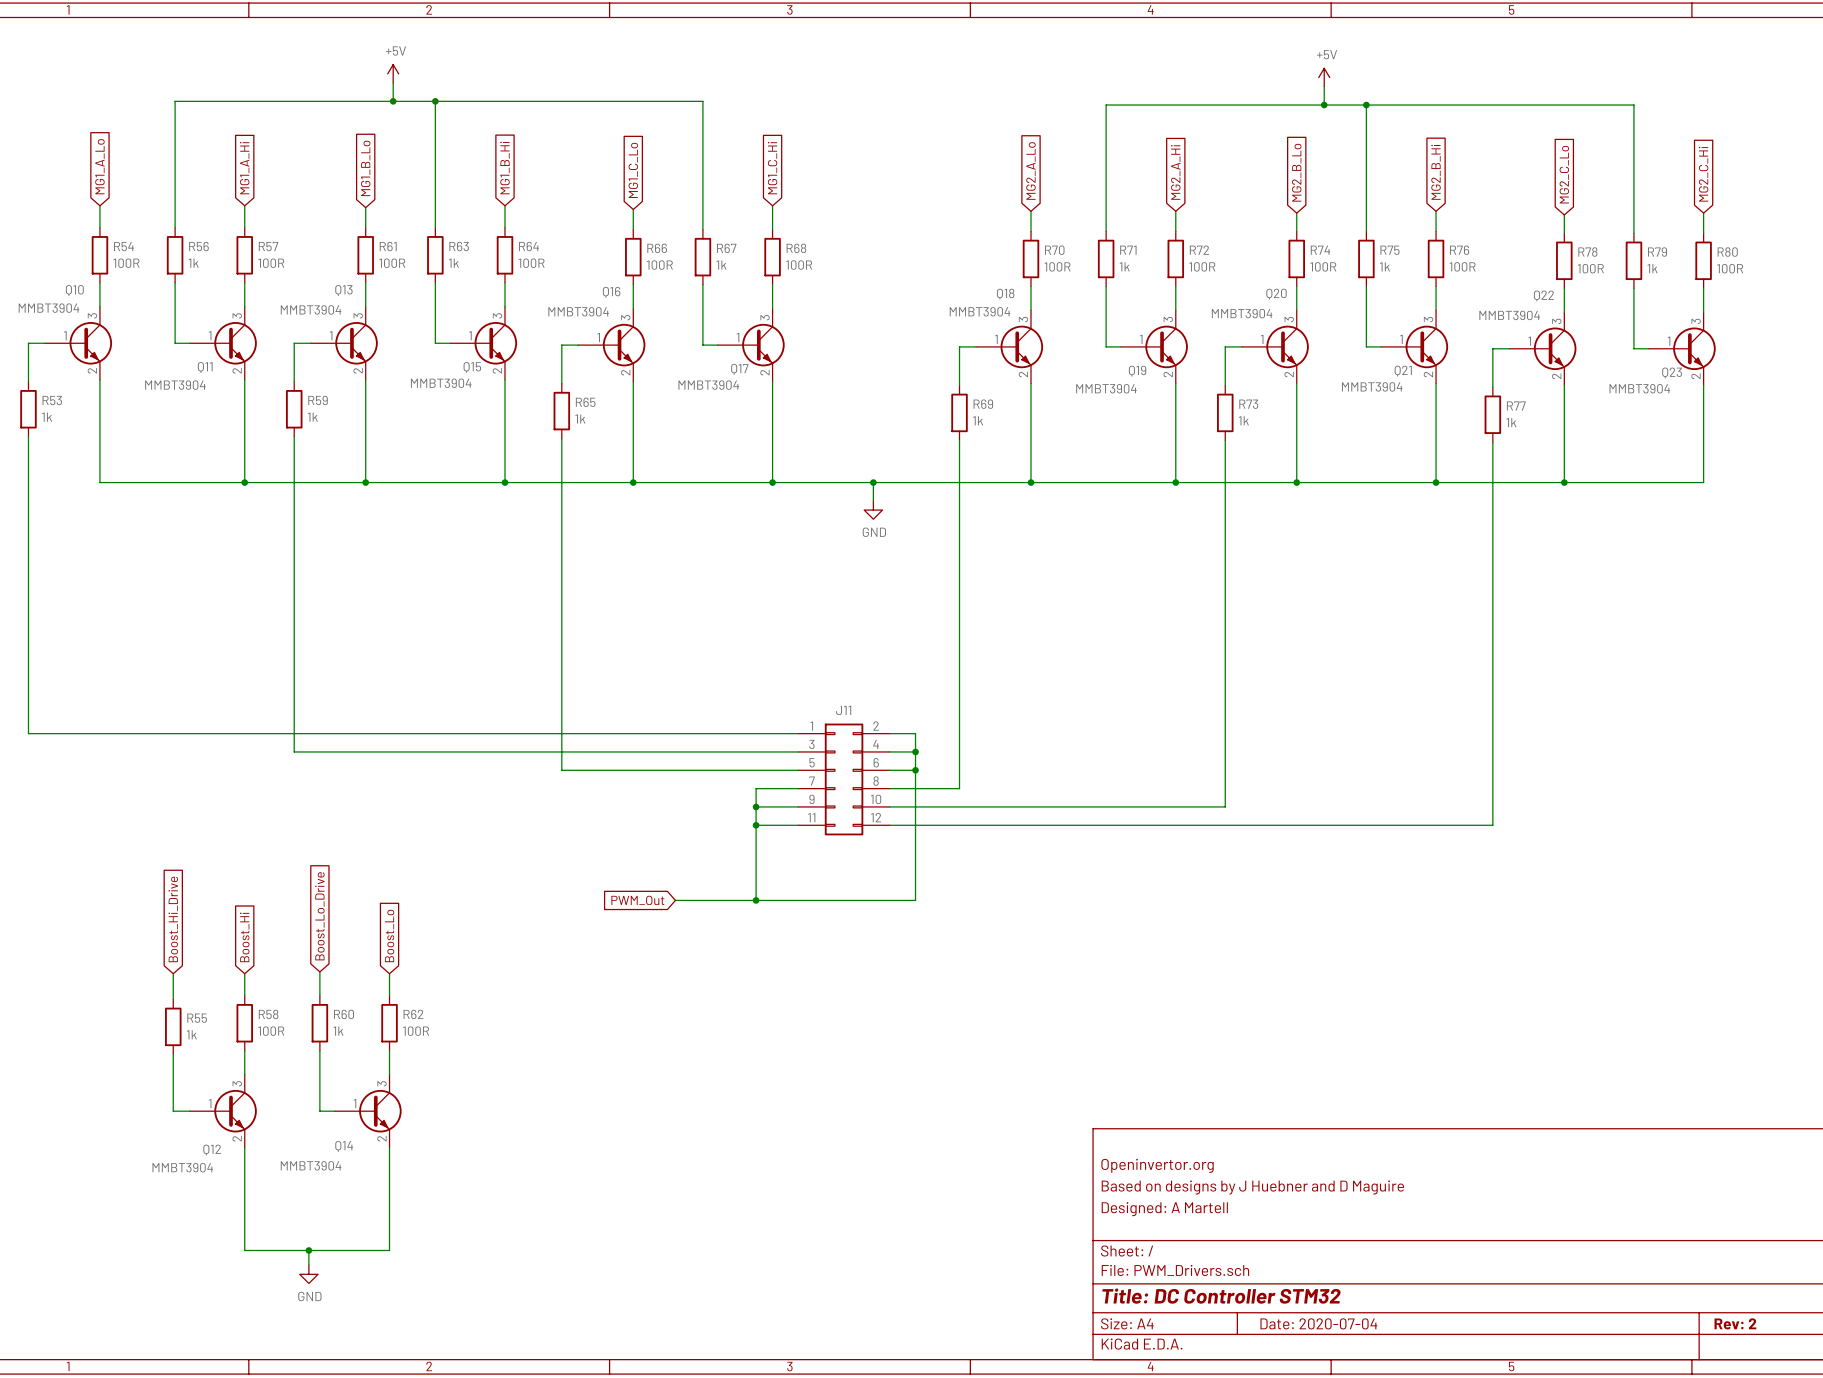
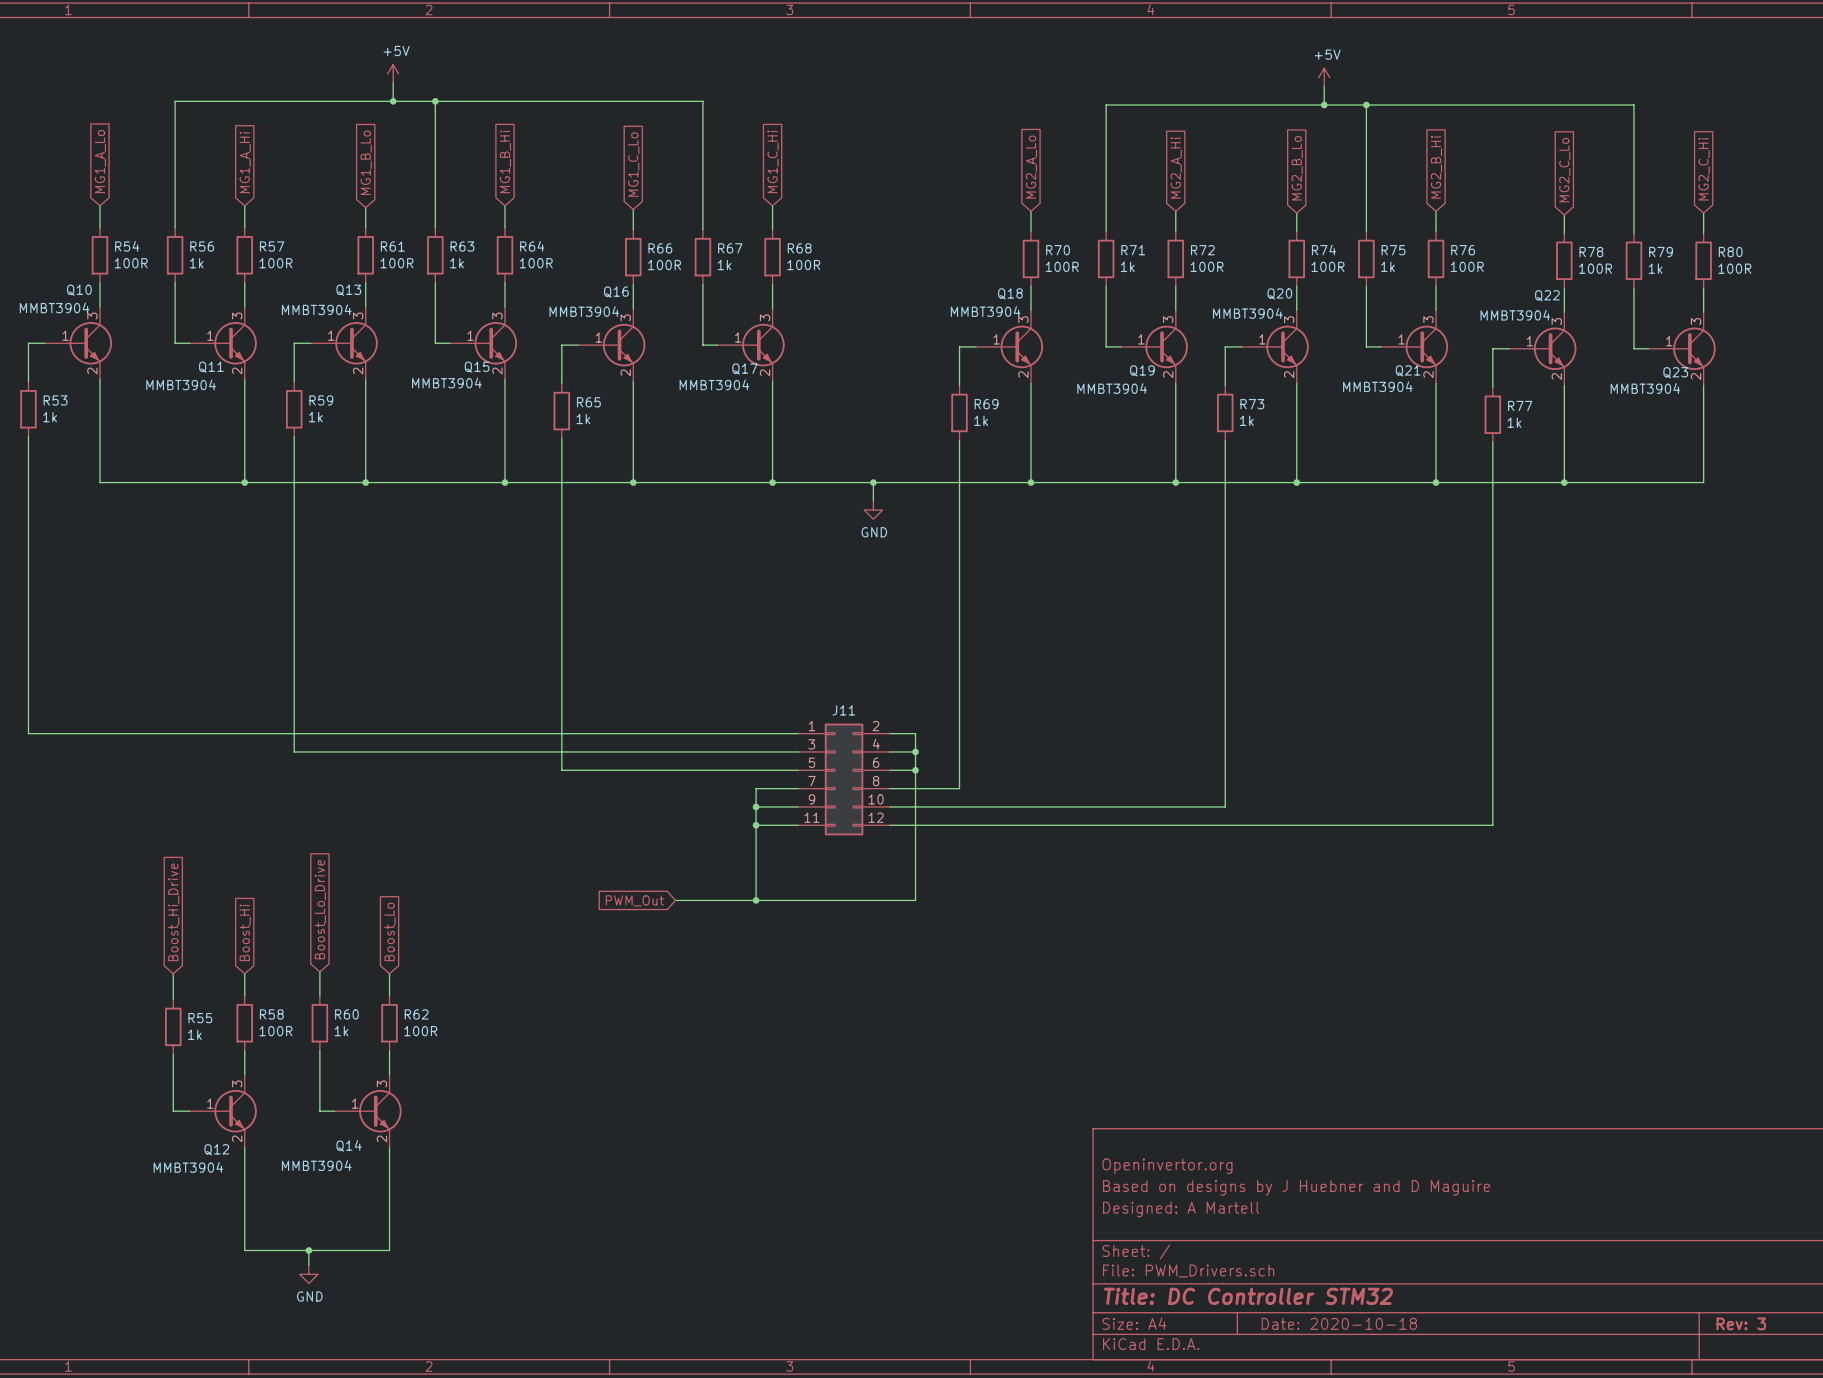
title block: Date: 2020-07-04 (1318, 1323) -> Date: 2020-10-18 (1339, 1323)
title block: Rev: 2 (1735, 1323) -> Rev: 3 (1741, 1323)

